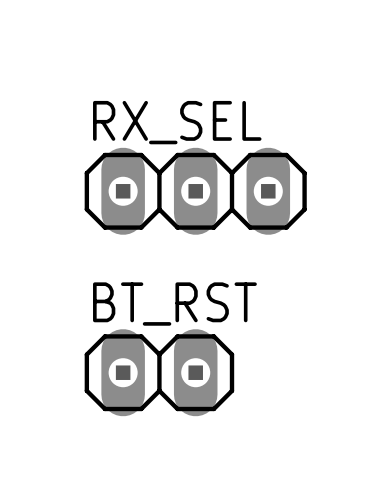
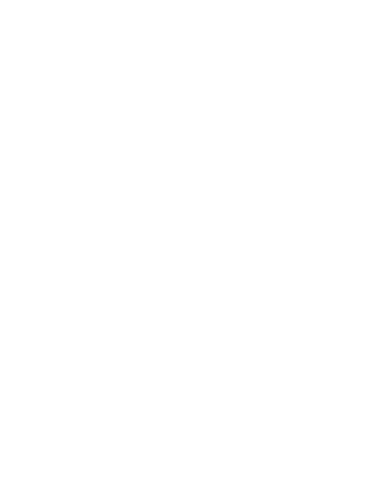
RX_SEL: (195, 191) -> none
BT_RST: (159, 372) -> none

